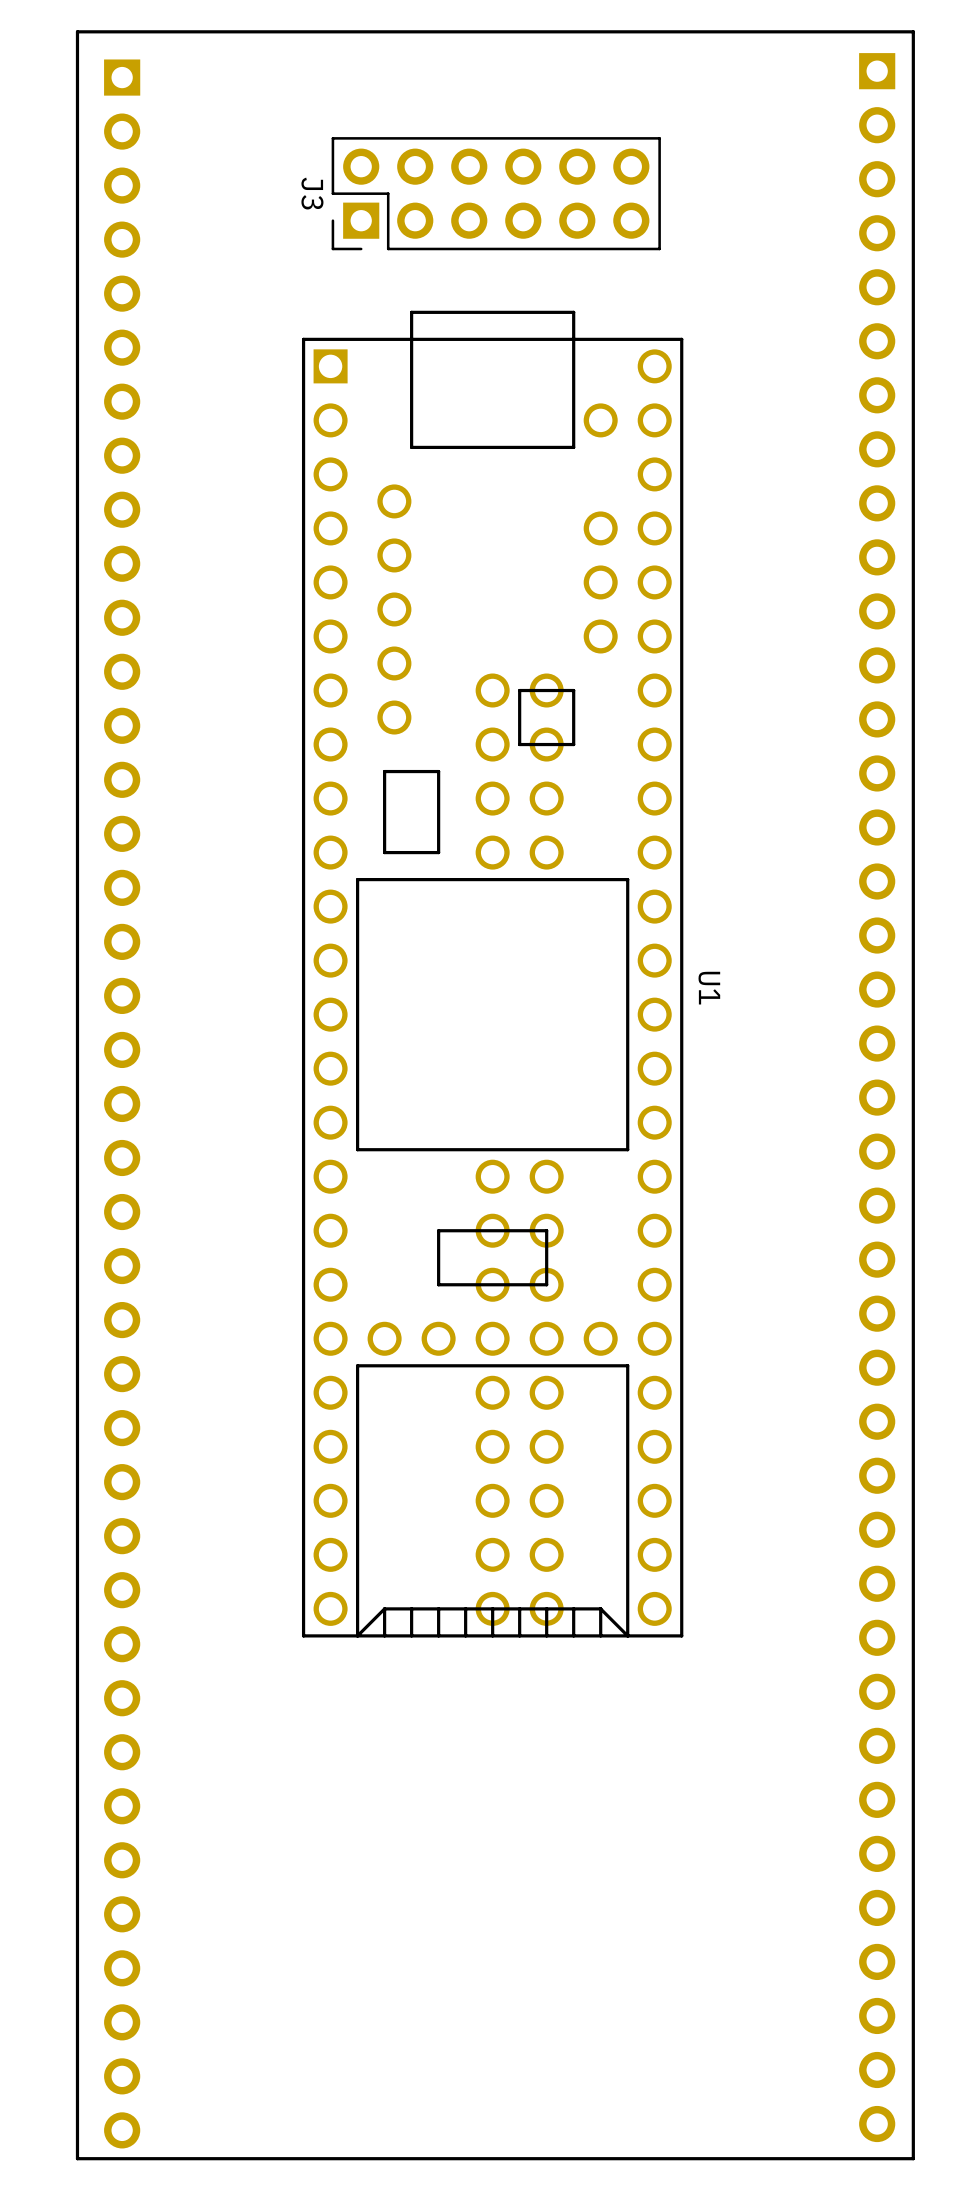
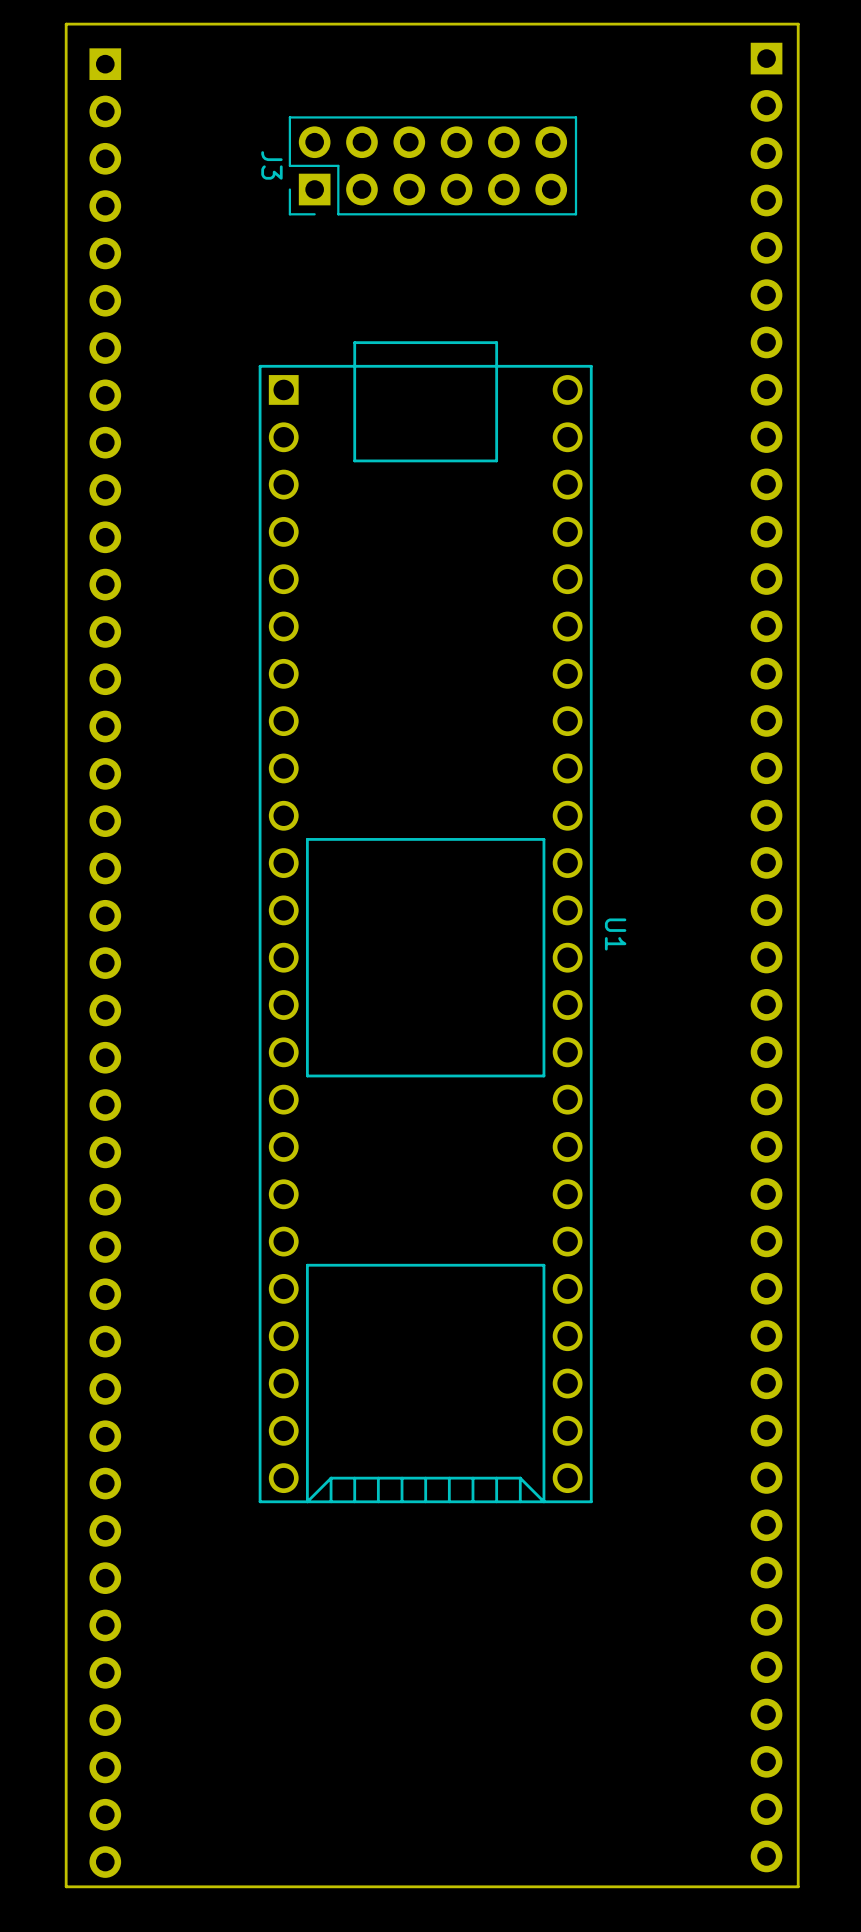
U1 footprint: [301, 310, 684, 1638] -> [258, 341, 593, 1504]

